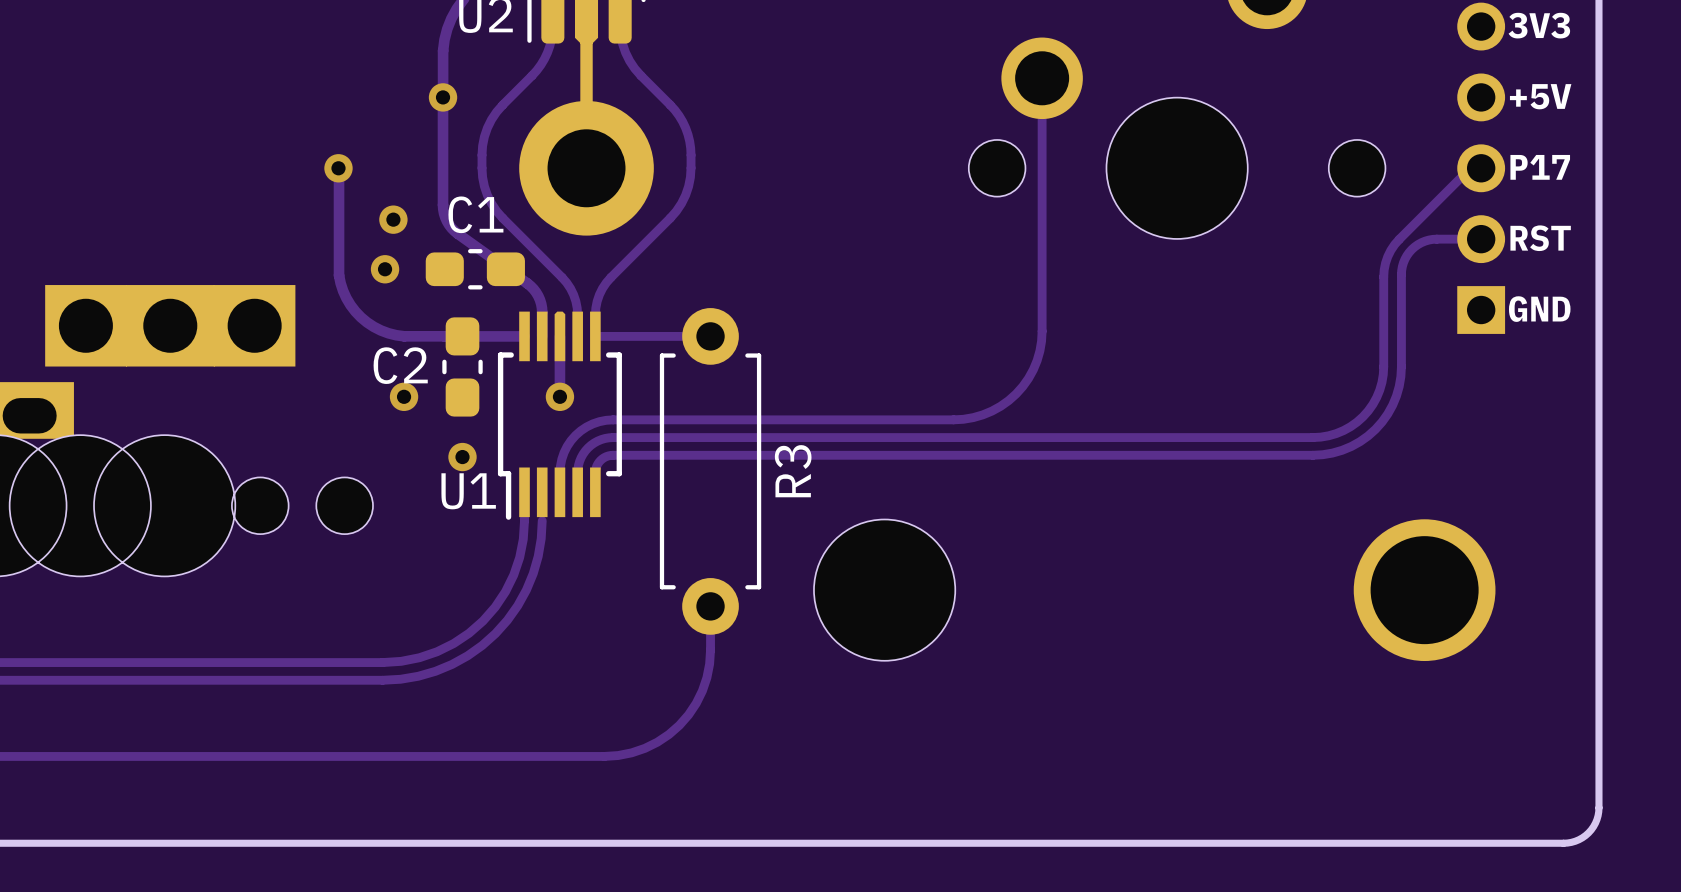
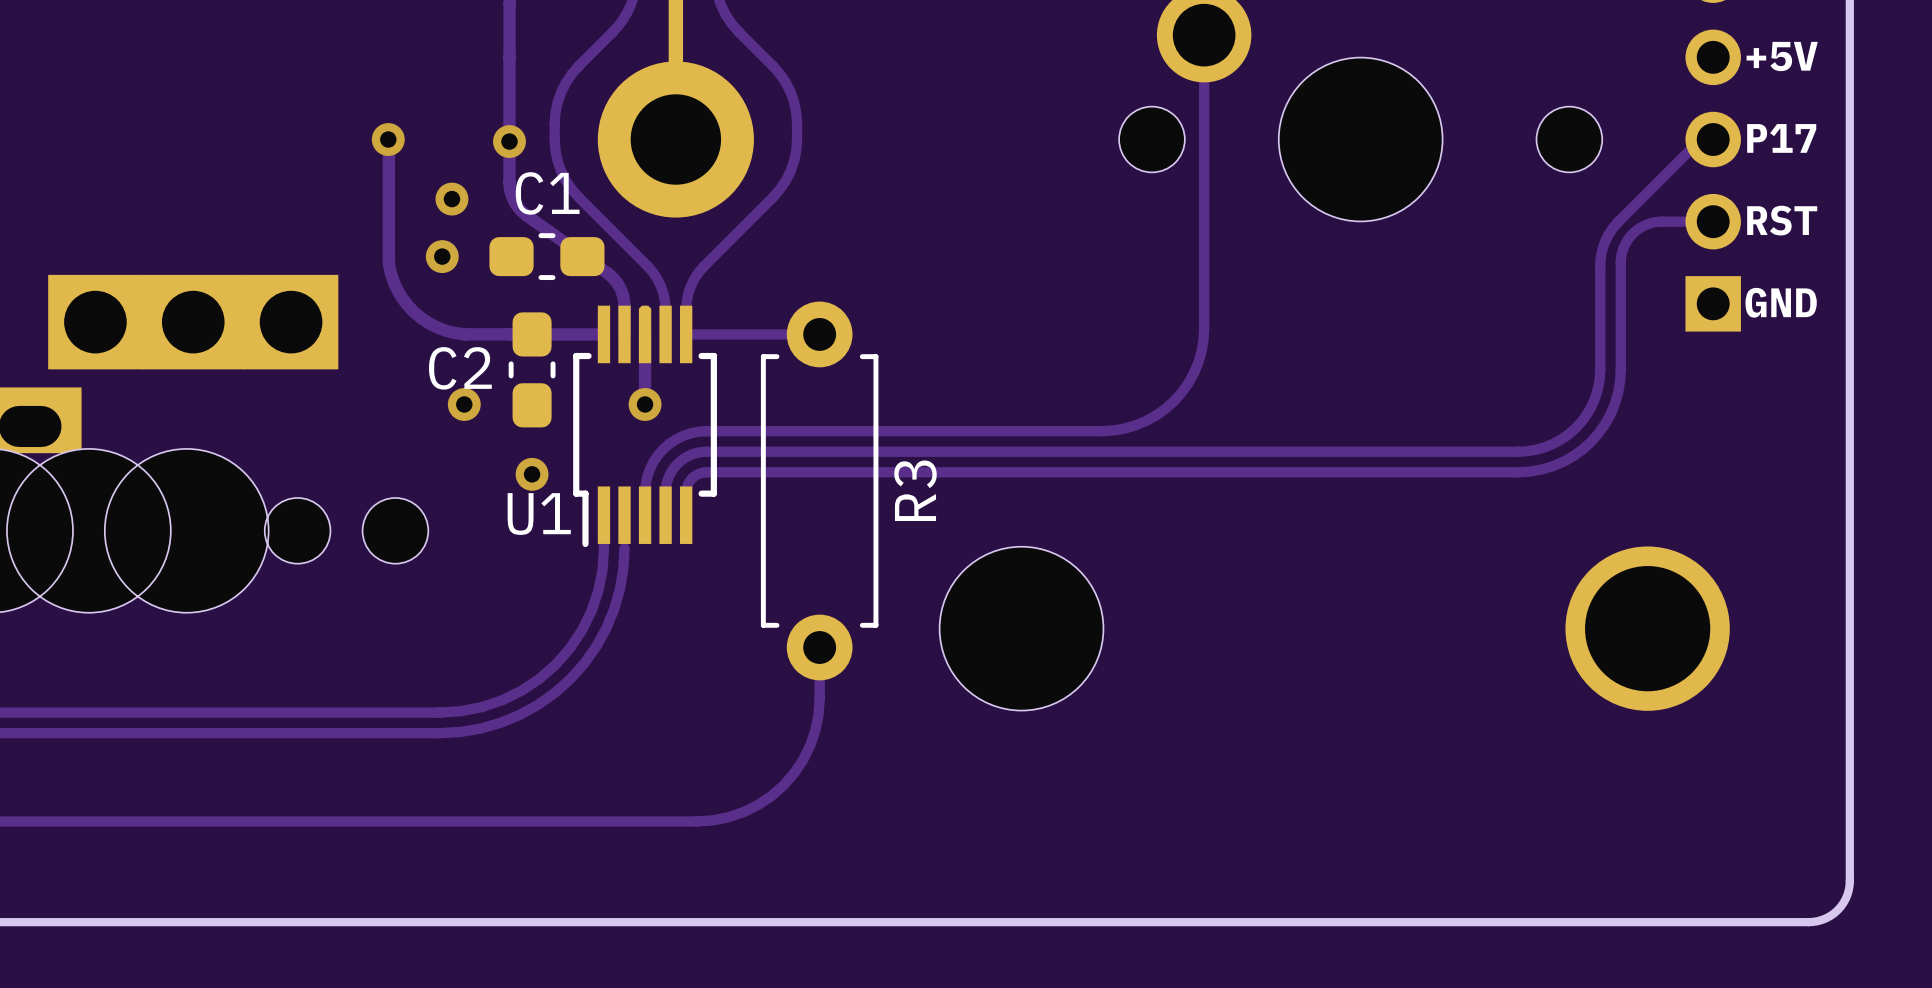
via position: (443, 97) -> (509, 141)

